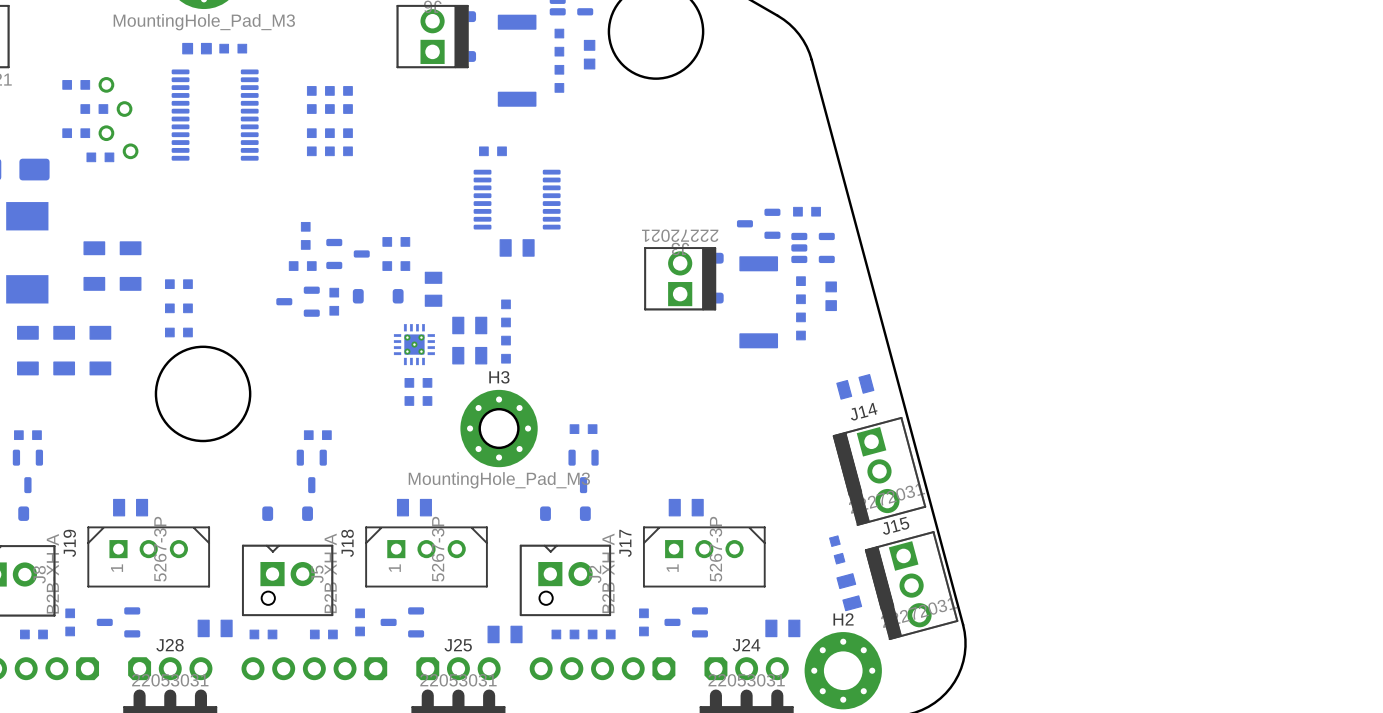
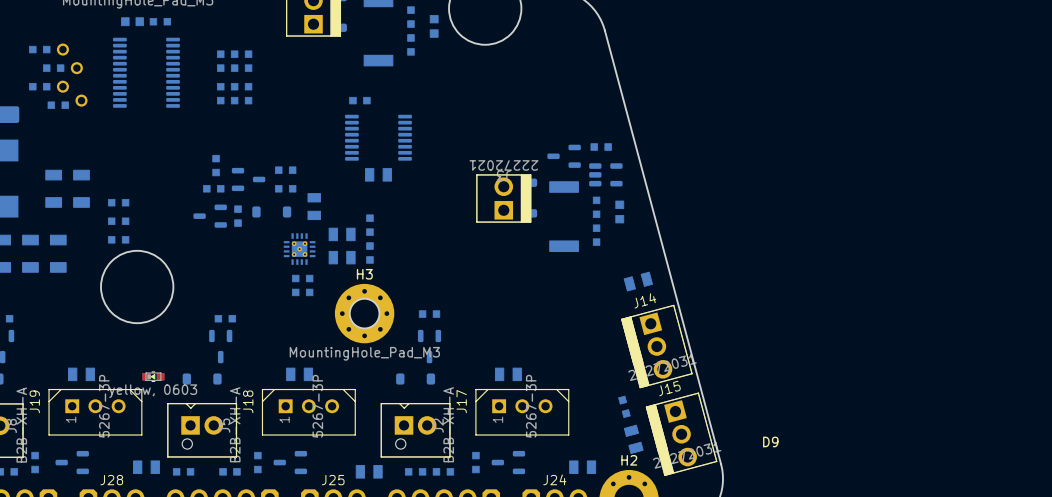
D9: none -> yellow, 0603 (153, 376)

